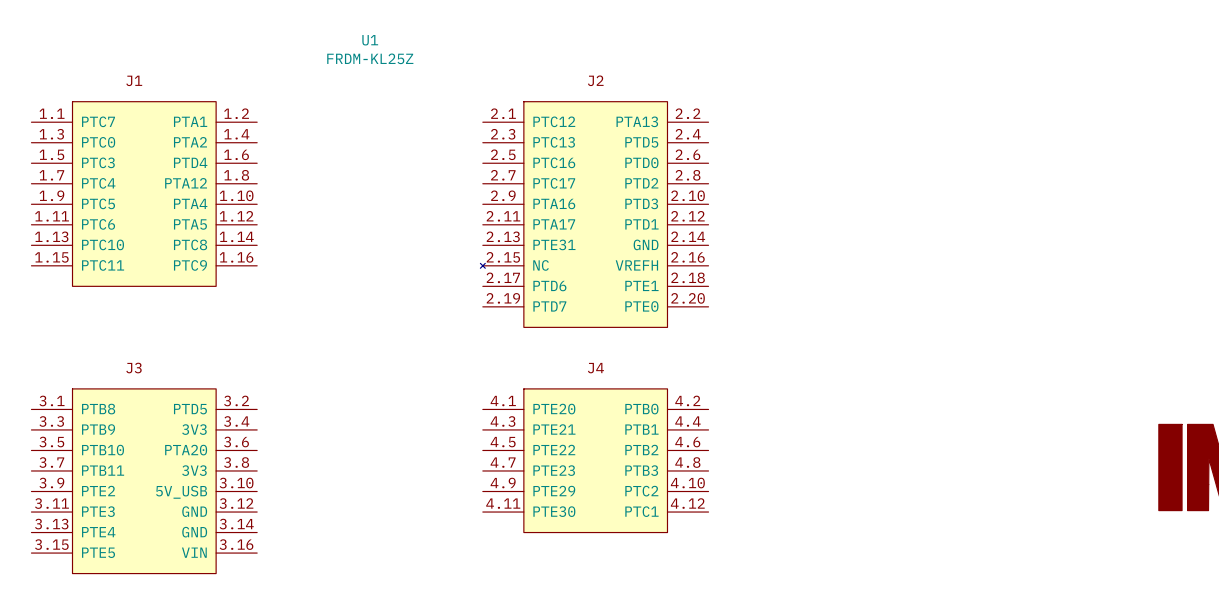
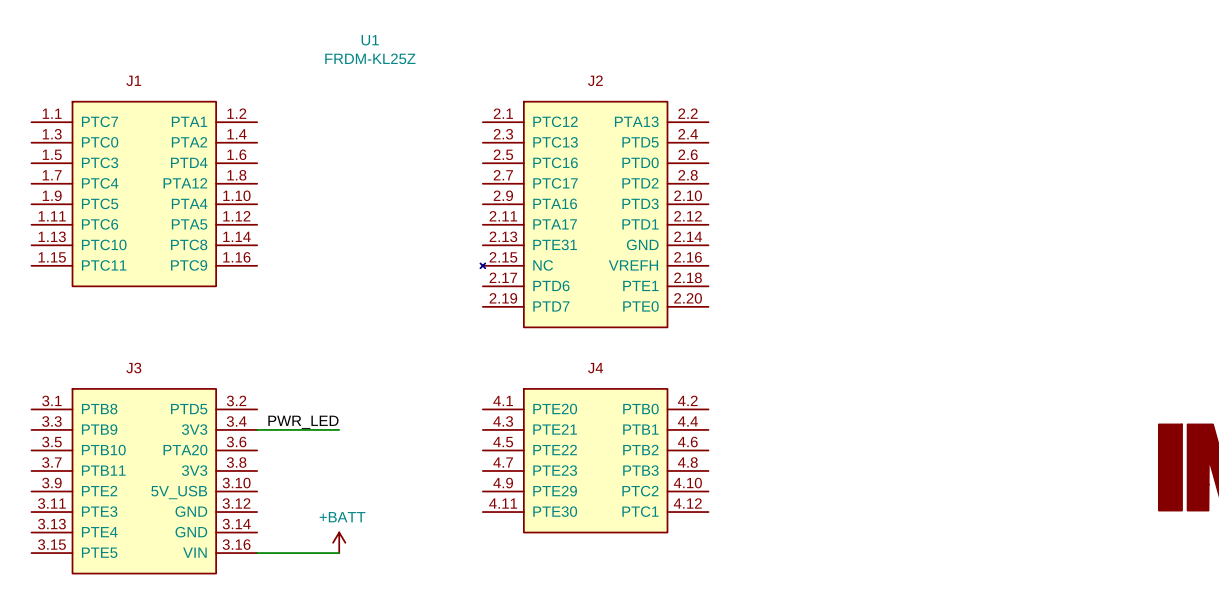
label: none -> PWR_LED (303, 422)
wire: none -> (257, 429) (339, 429)
power symbol: none -> +BATT (339, 542)
wire: none -> (257, 553) (339, 553)

